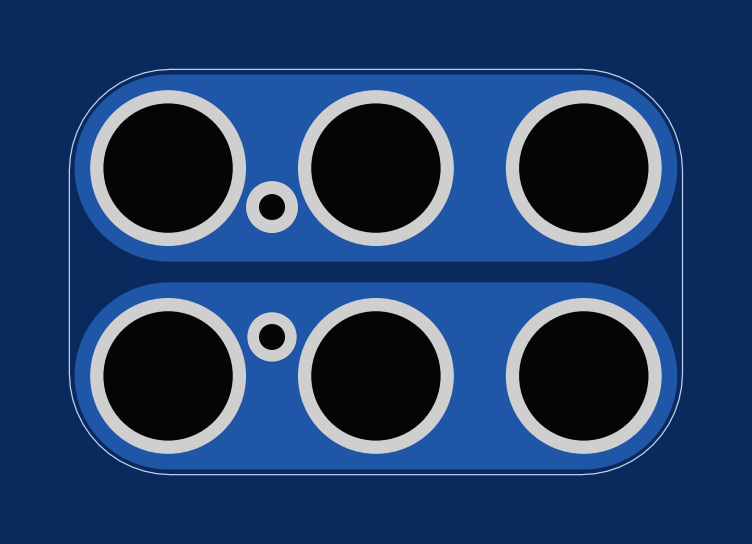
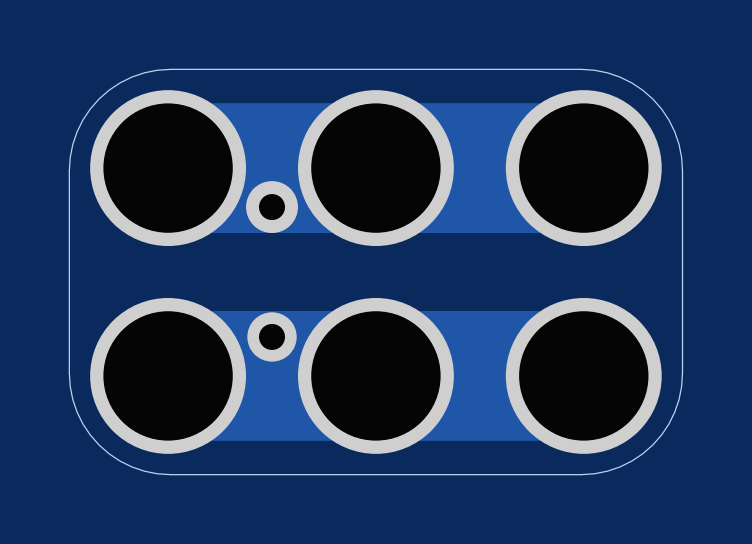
part footprint: [68, 68, 684, 476] -> [68, 68, 684, 476]

